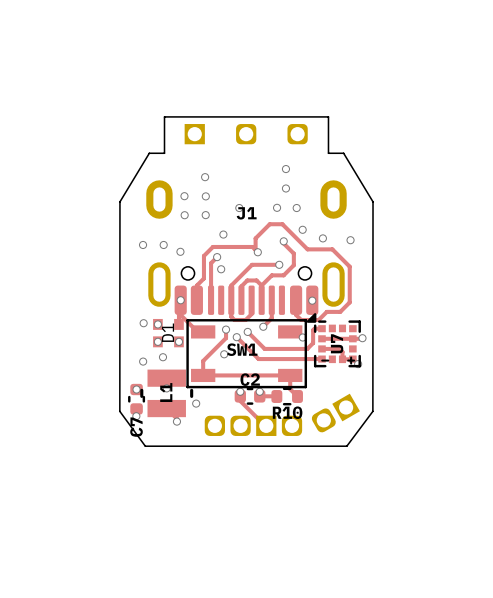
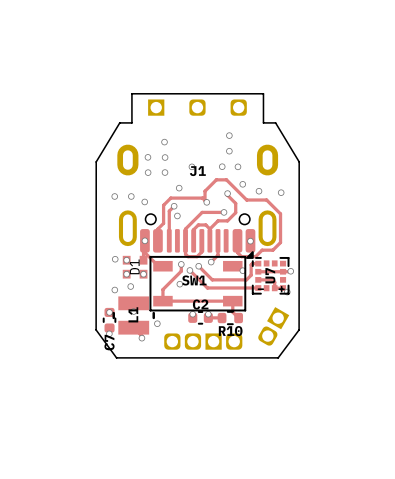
track: (240, 396) (240, 400) (266, 425) -> none
part: none -> (278, 318)
part: (346, 407) -> none
part: none -> (267, 336)
part: (323, 420) -> none

